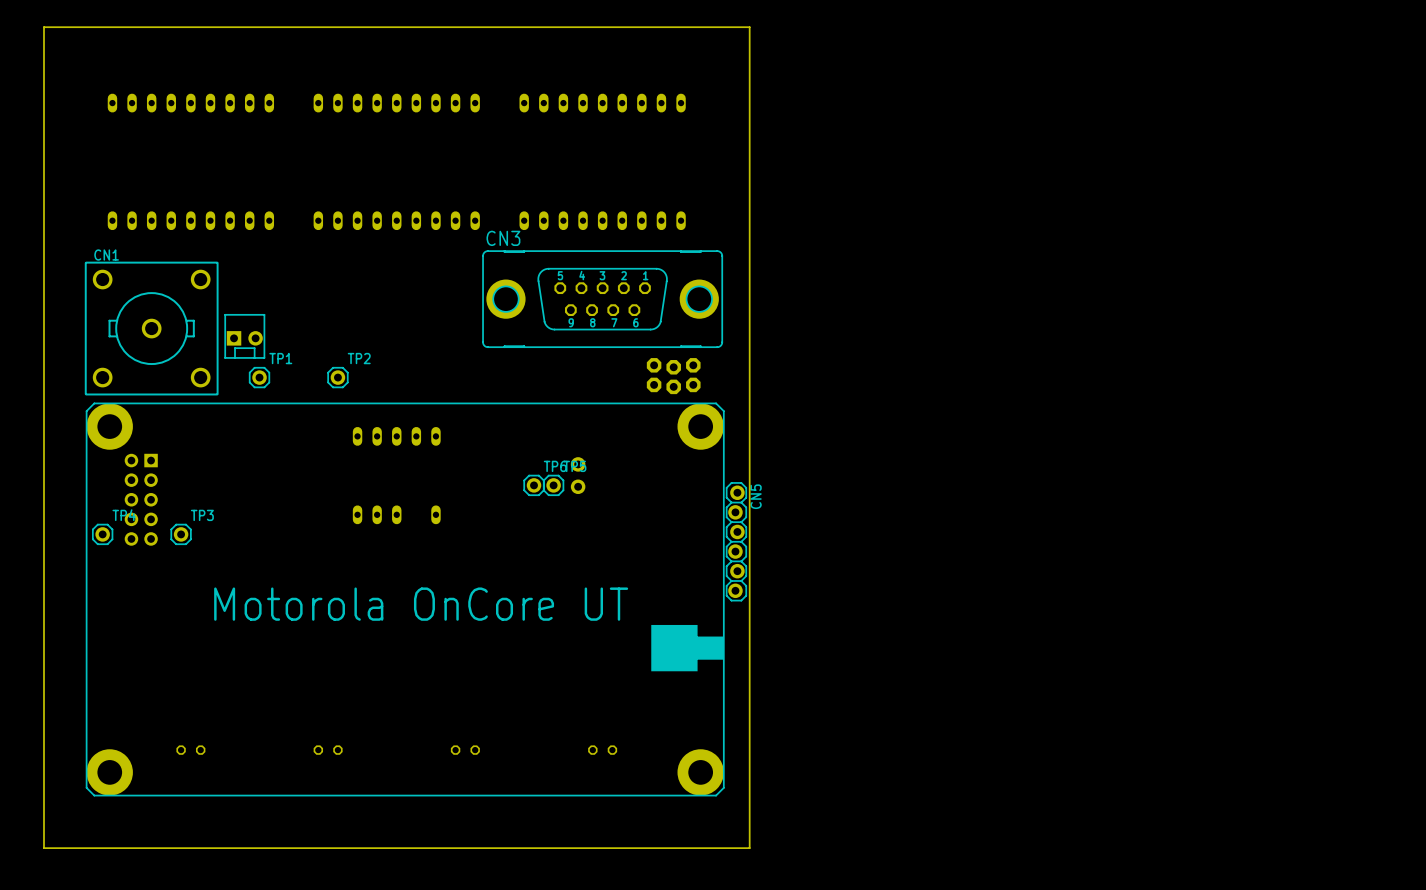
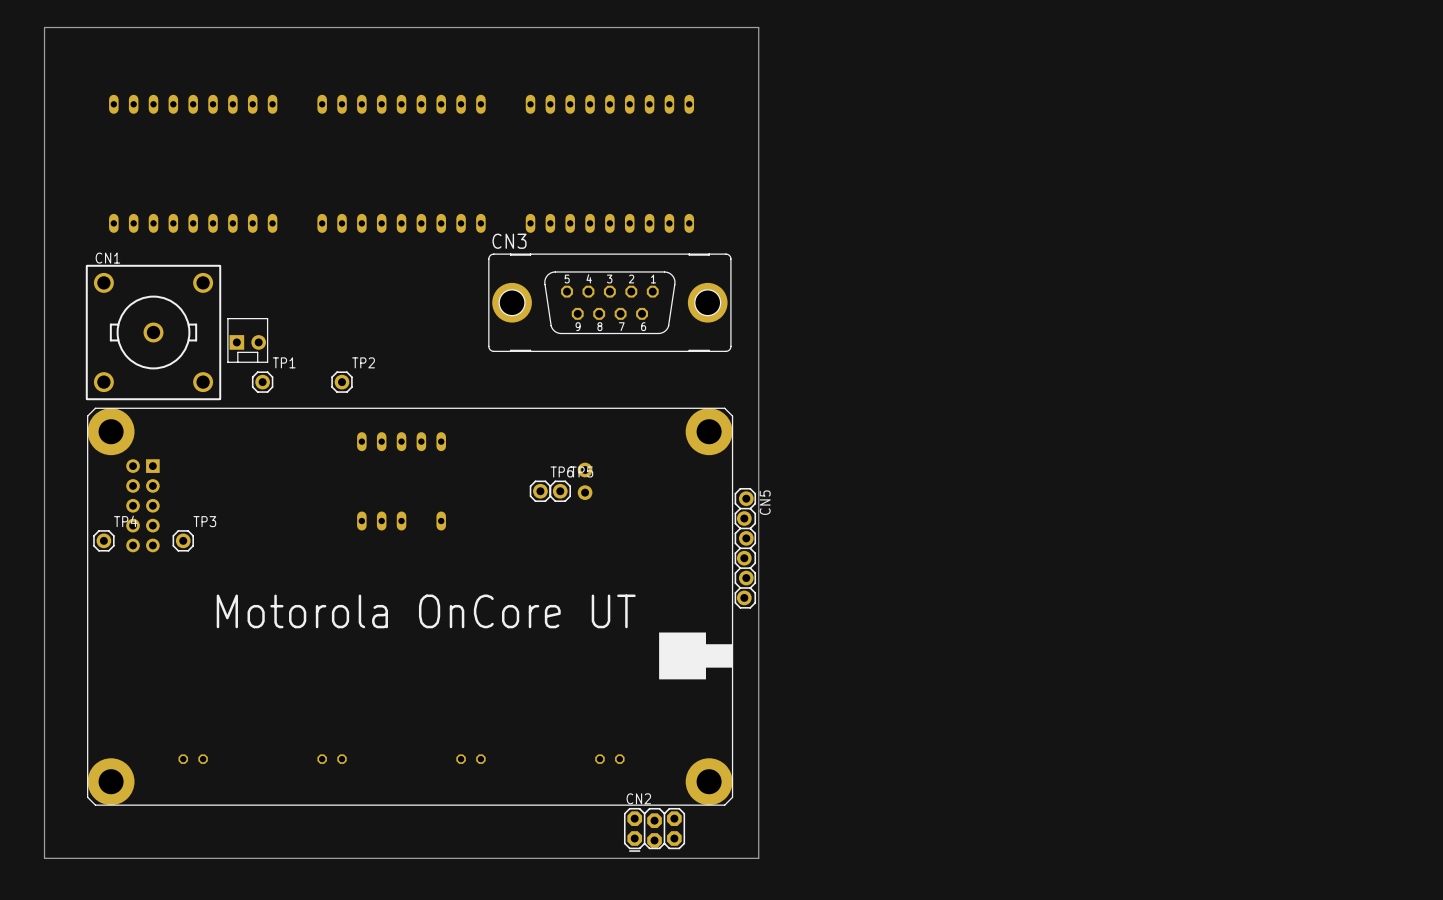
part: (673, 376) -> none
CN2: none -> (654, 829)

